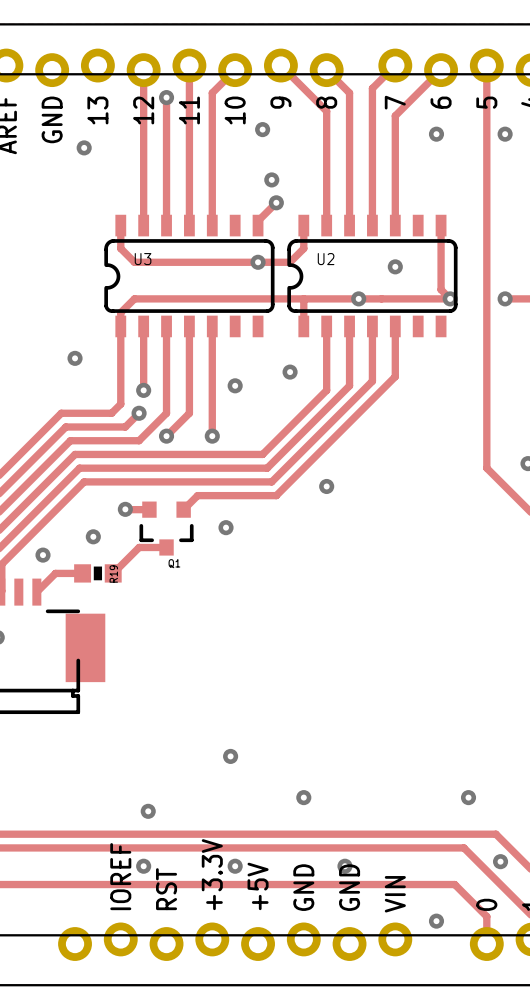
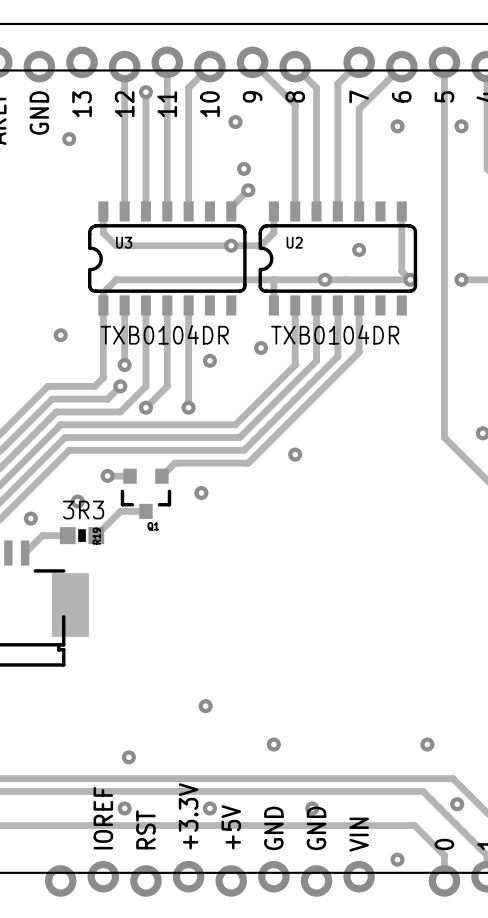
text: none -> TXB0104DR (164, 334)
text: none -> TXB0104DR (335, 334)
text: none -> 3R3 (83, 510)

